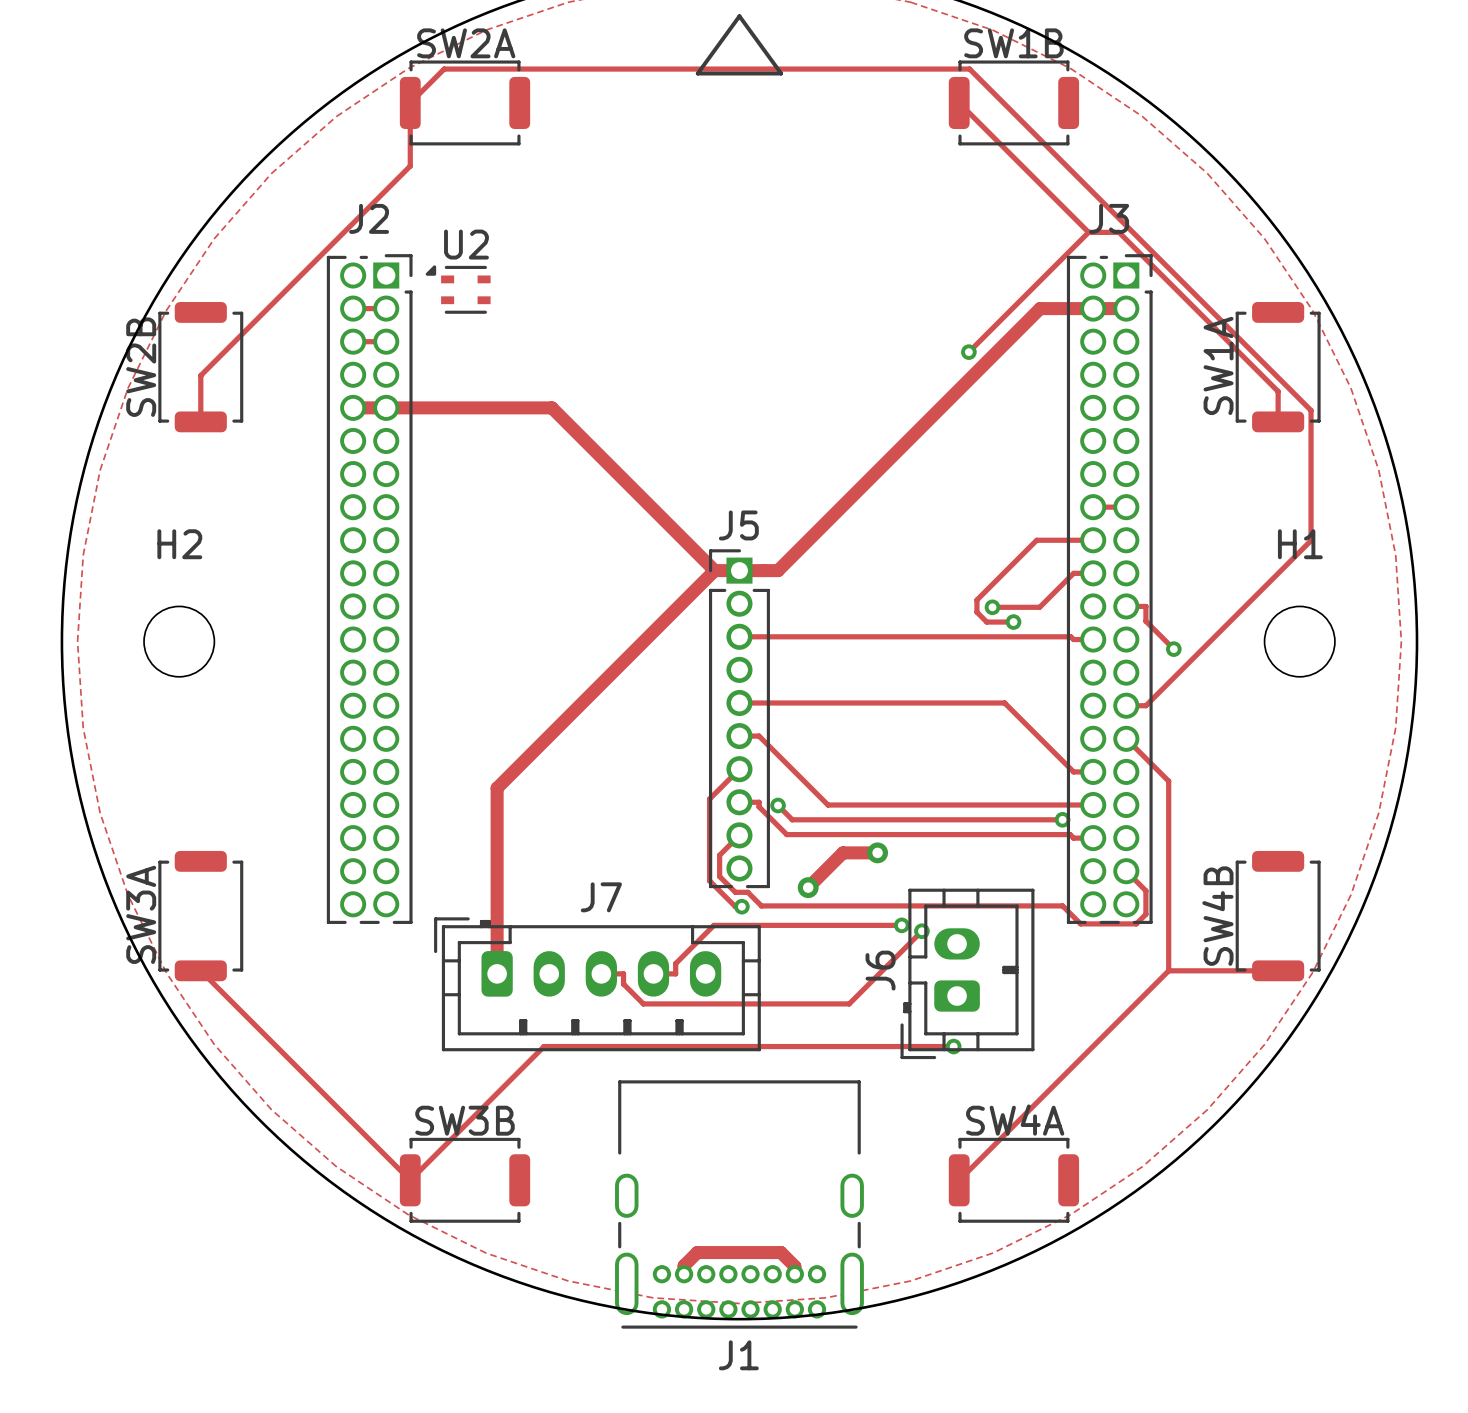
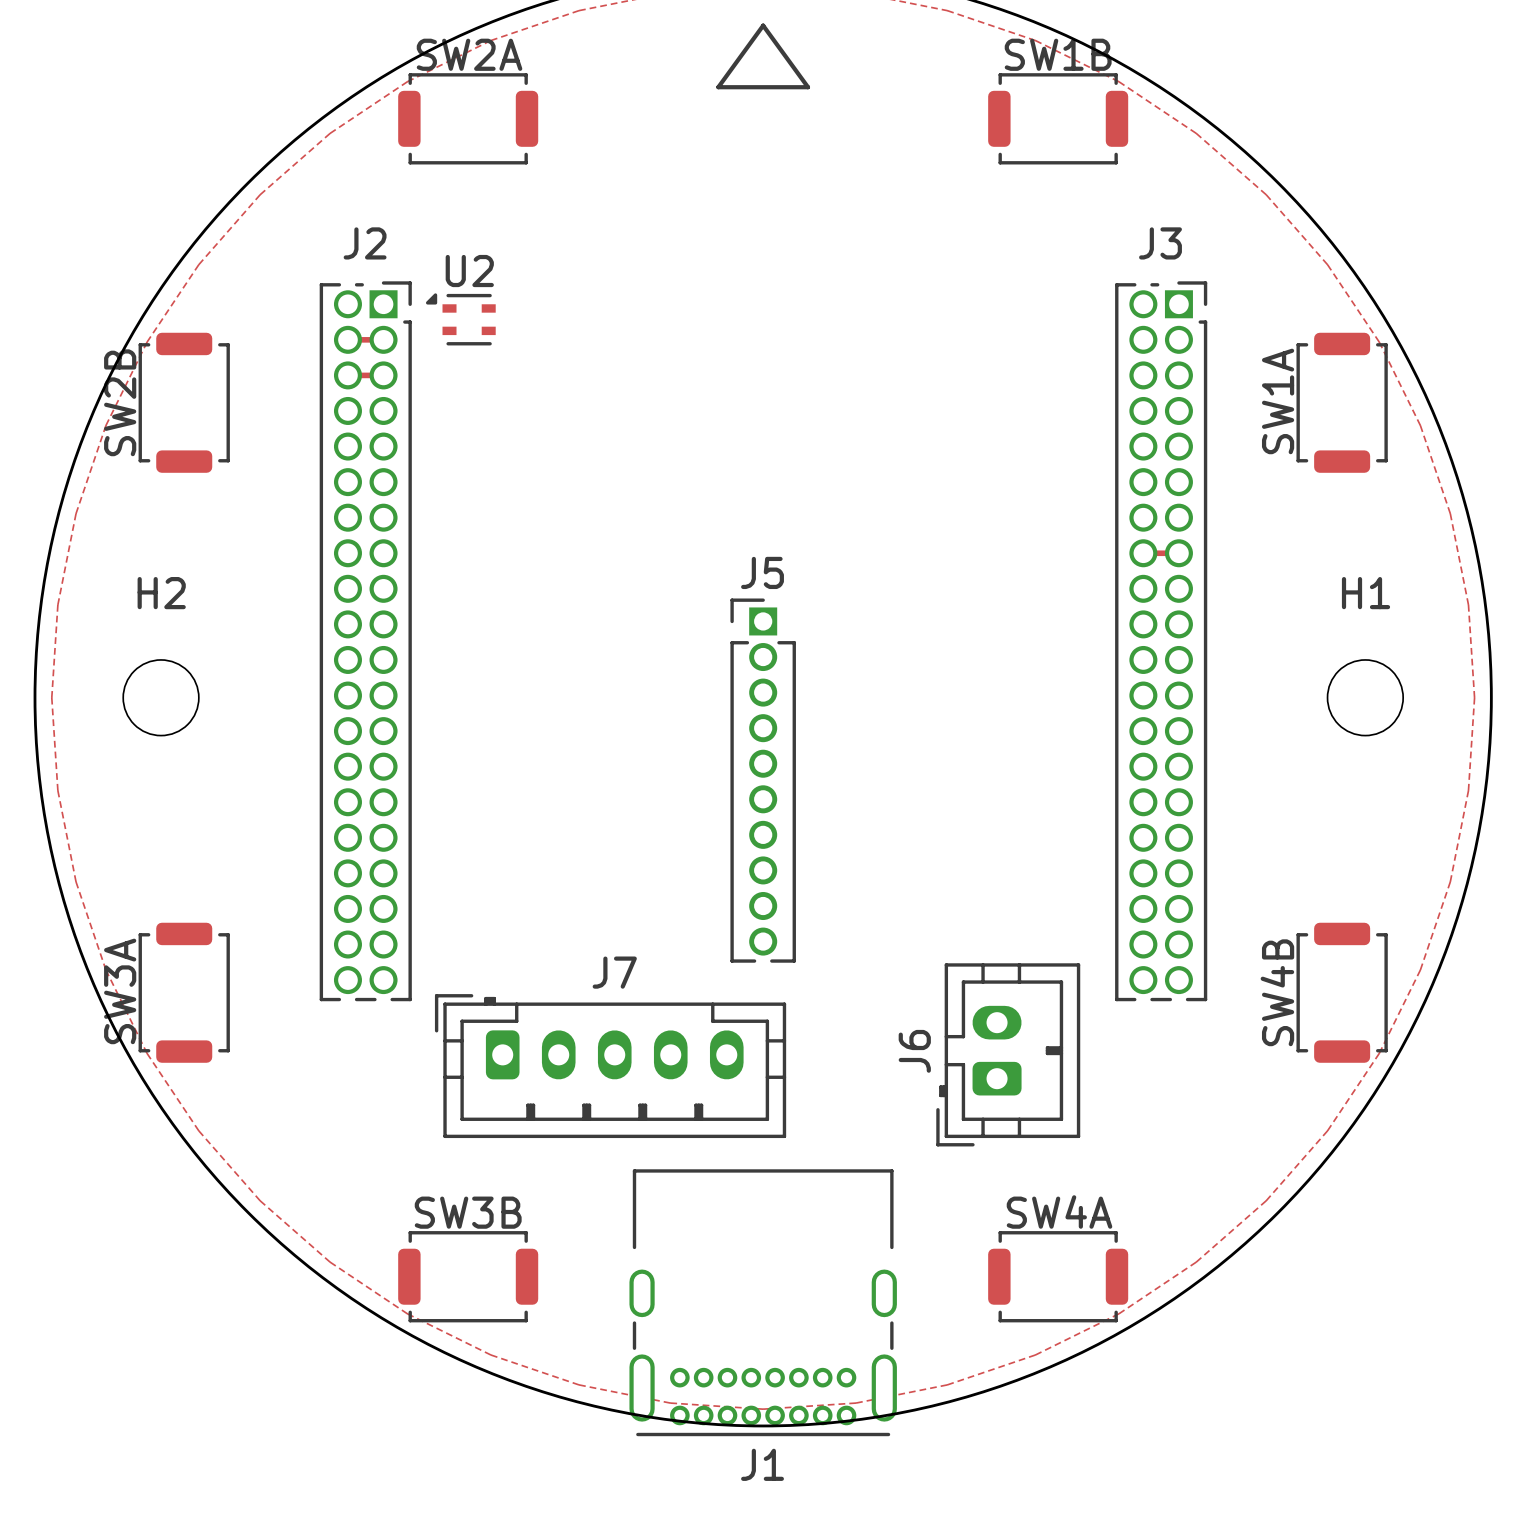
track: (959, 102) (1088, 232) -> none
track: (1088, 232) (968, 352) -> none
track: (1088, 232) (1119, 232) (1278, 391) (1278, 421) -> none
track: (1126, 308) (1040, 308) (778, 570) (714, 570) -> none
via: (968, 352) -> none
track: (353, 407) (551, 407) (714, 570) -> none
track: (200, 421) (200, 375) (410, 166) (410, 102) (444, 69) (969, 69) (1311, 410) (1311, 540) (1145, 705) (1126, 705) -> none
track: (1093, 540) (1036, 540) (976, 600) (976, 612) (986, 622) (1013, 622) -> none
track: (714, 570) (497, 788) (497, 973) -> none
track: (1093, 573) (1073, 573) (1039, 607) (992, 607) -> none
track: (1126, 606) (1145, 606) (1145, 621) (1173, 649) -> none
via: (992, 607) -> none
via: (1013, 622) -> none
track: (739, 636) (1070, 636) (1073, 639) (1093, 639) -> none
via: (1173, 649) -> none
track: (739, 702) (1004, 702) (1073, 771) (1093, 771) -> none
track: (739, 736) (759, 736) (827, 805) (1093, 805) -> none
track: (1126, 738) (1168, 781) (1168, 970) -> none
track: (739, 769) (709, 799) (709, 880) (735, 906) (741, 906) -> none
track: (739, 802) (759, 802) (759, 806) (786, 834) (1070, 834) (1073, 838) (1093, 838) -> none
track: (778, 805) (792, 819) (1062, 819) -> none
via: (778, 805) -> none
via: (1062, 819) -> none
track: (739, 835) (719, 855) (719, 876) (735, 892) (747, 892) (761, 905) (1062, 905) (1080, 923) (1136, 923) (1145, 914) (1145, 890) (1126, 871) -> none
track: (877, 852) (842, 852) (808, 887) -> none
via: (877, 852) -> none
via: (808, 887) -> none
via: (741, 906) -> none
track: (901, 925) (713, 925) (675, 963) (675, 973) (653, 973) -> none
via: (901, 925) -> none
track: (921, 931) (849, 1003) (643, 1003) (623, 984) (623, 973) (601, 973) -> none
via: (921, 931) -> none
track: (200, 970) (410, 1180) (544, 1046) (953, 1046) -> none
track: (1168, 970) (1278, 970) -> none
track: (1168, 970) (959, 1180) -> none
via: (953, 1046) -> none
track: (684, 1274) (684, 1265) (697, 1252) (781, 1252) (794, 1266) (794, 1274) -> none

